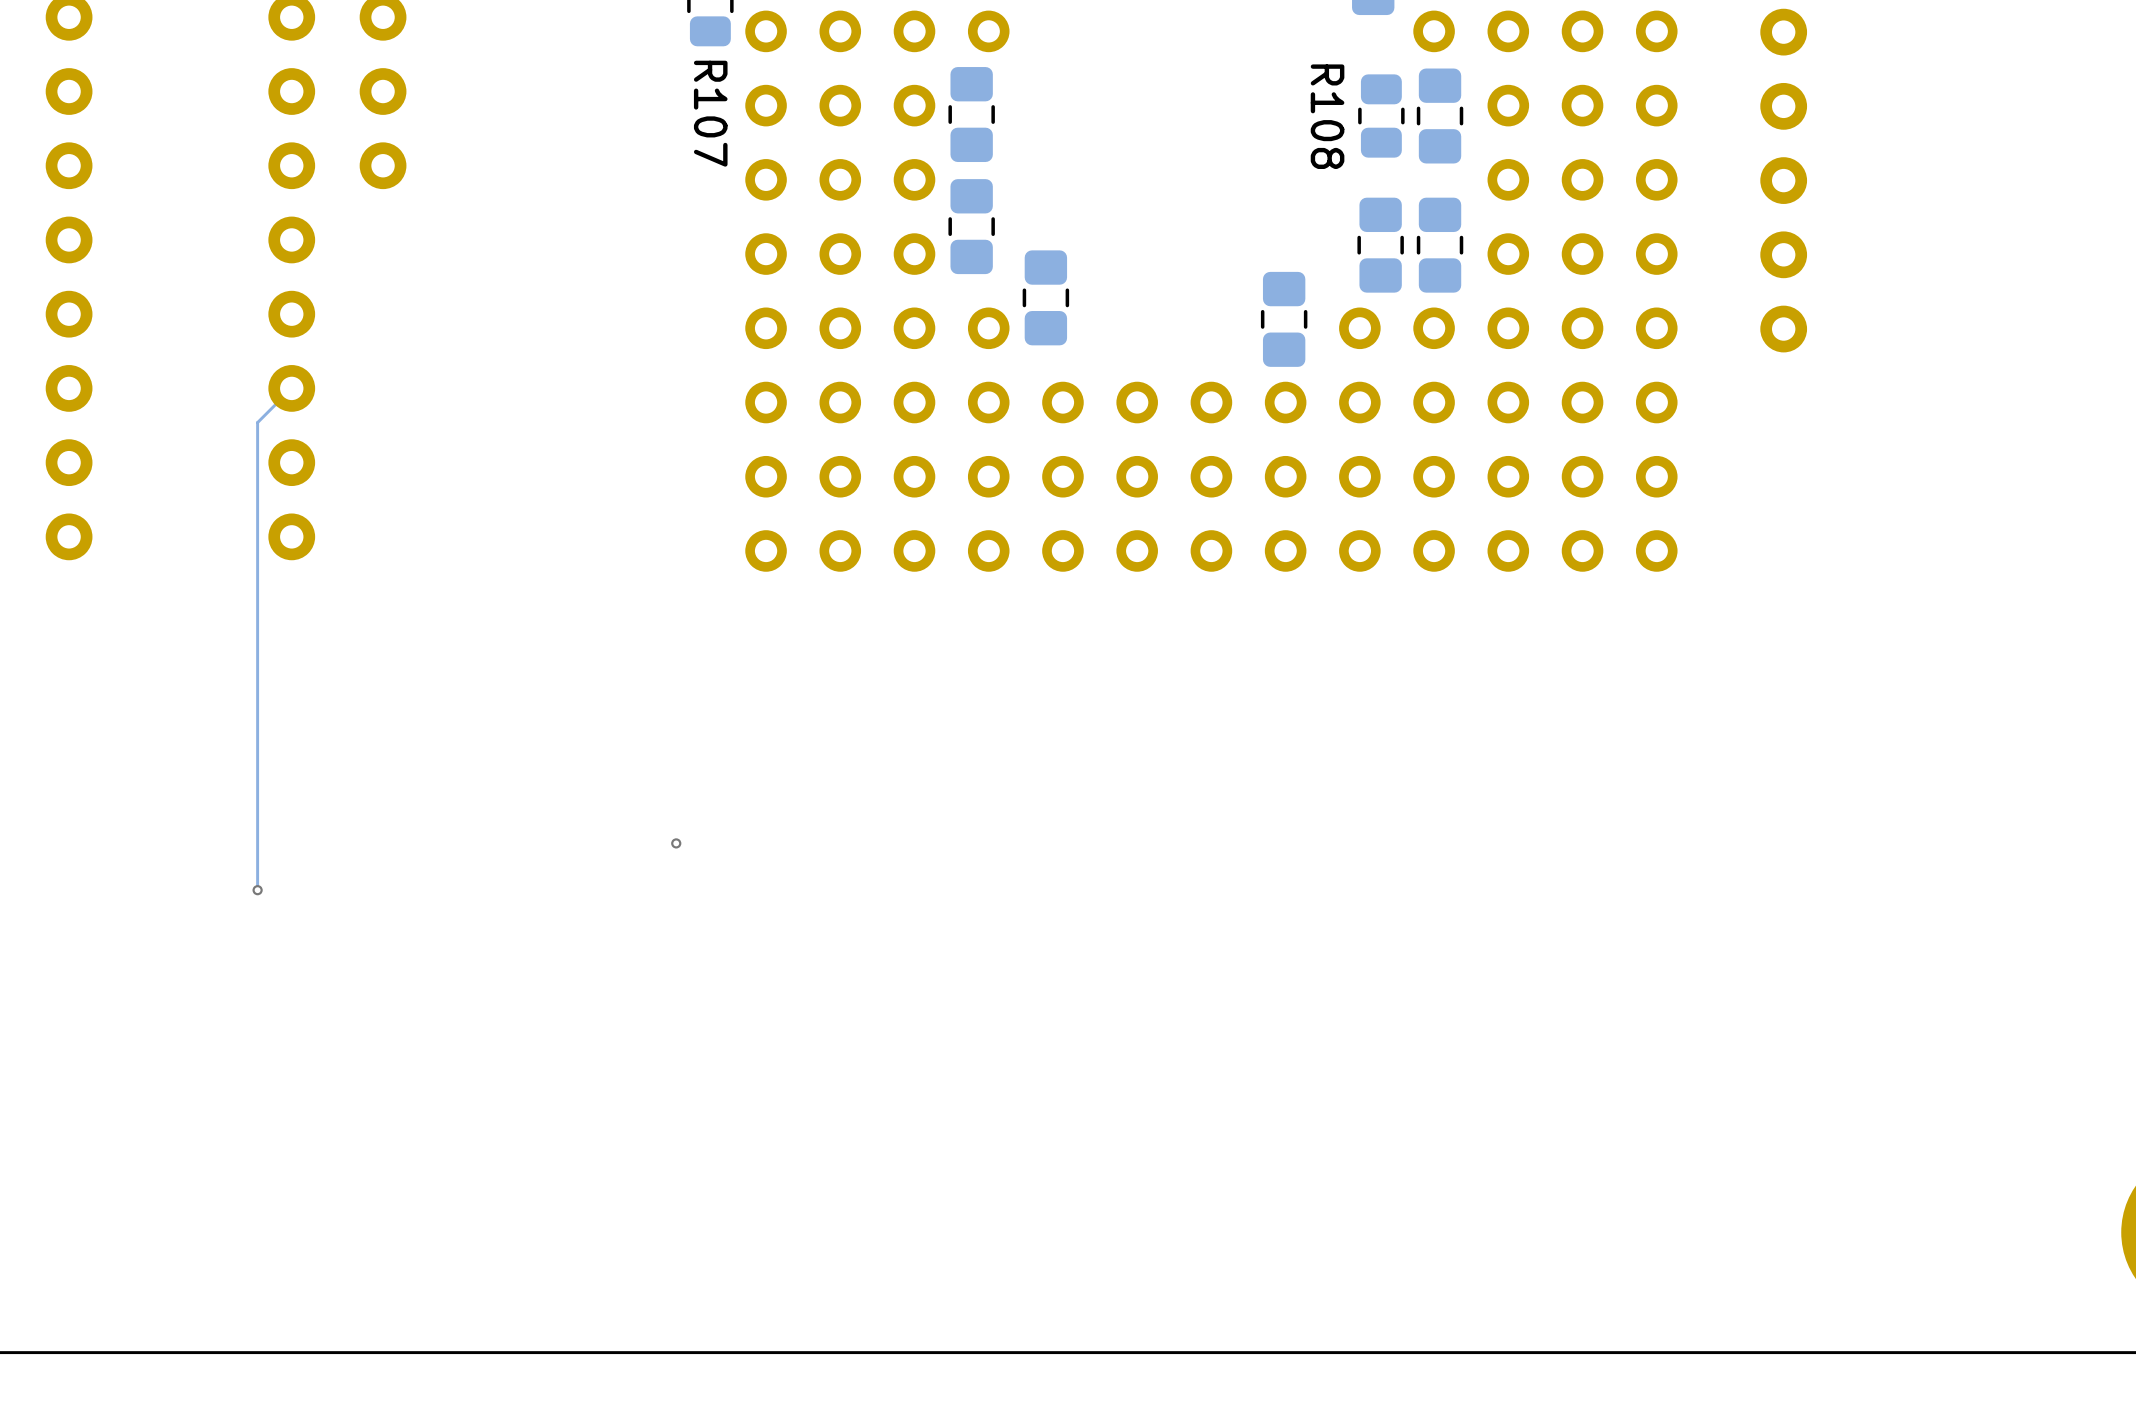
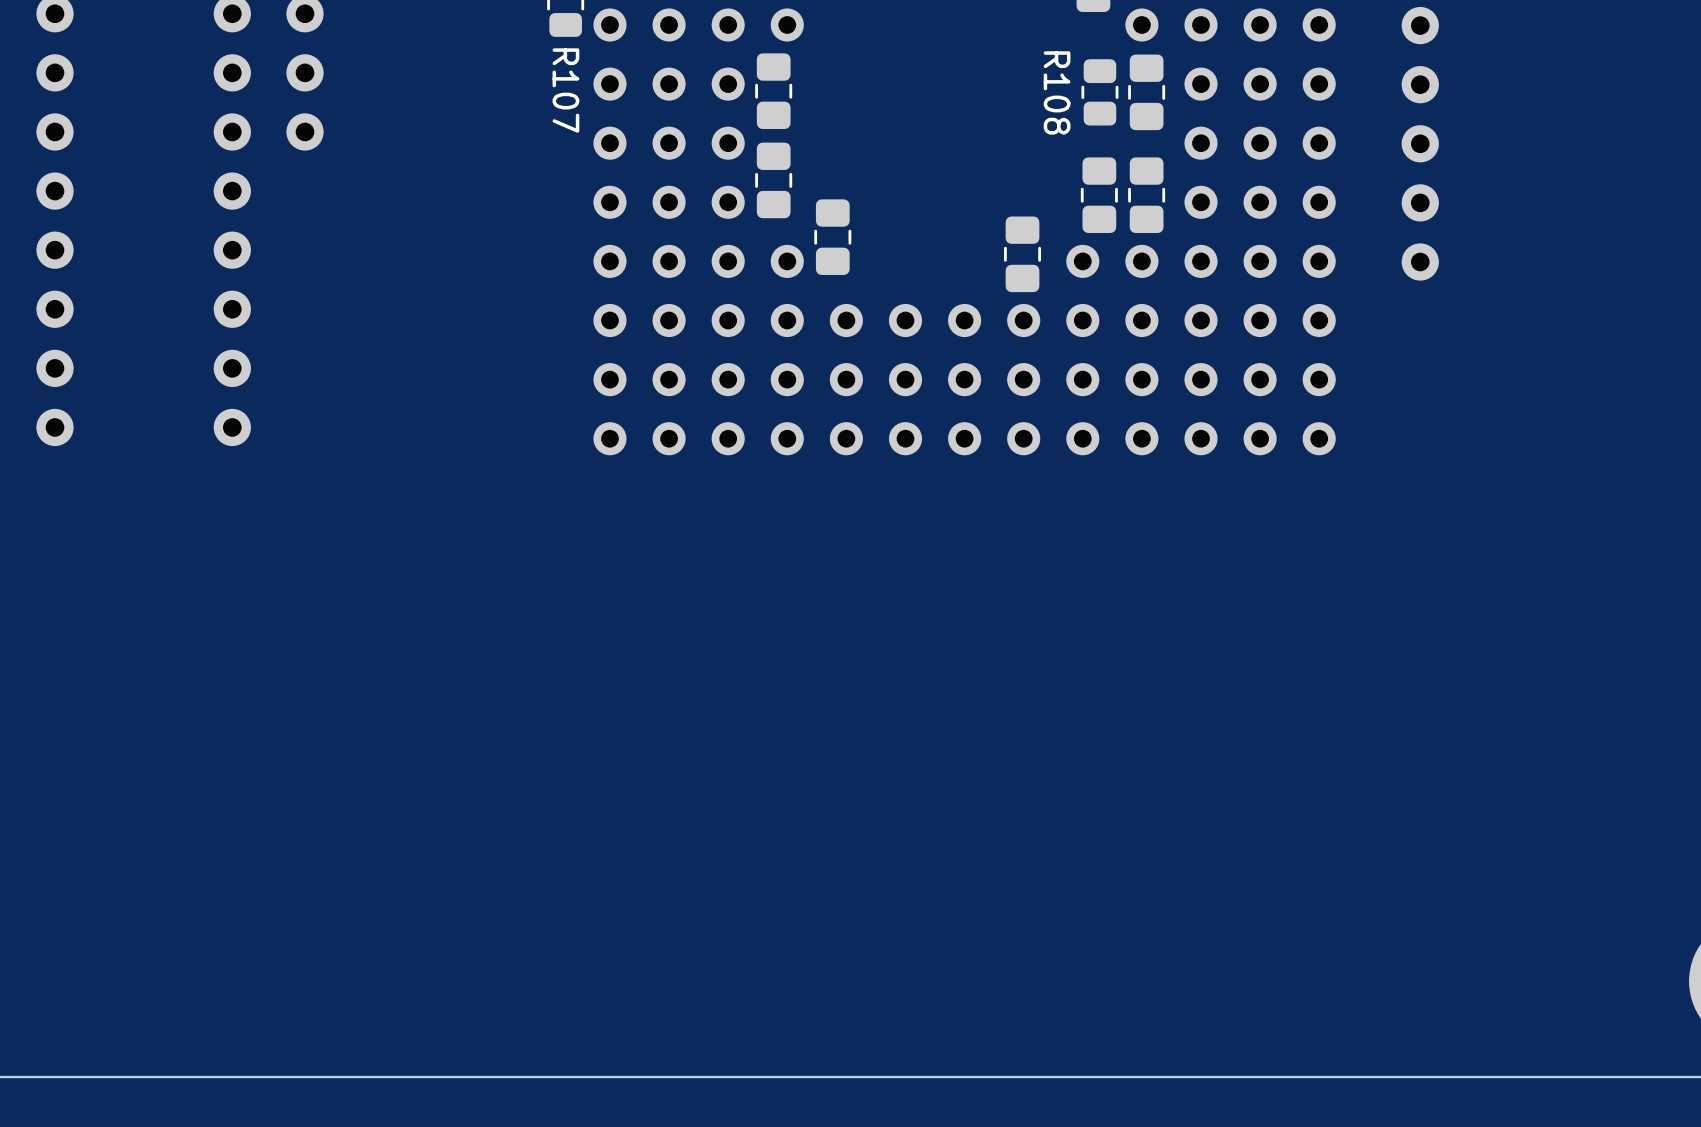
track: (291, 388) (257, 422) (257, 890) -> none
via: (676, 843) -> none
via: (257, 890) -> none

